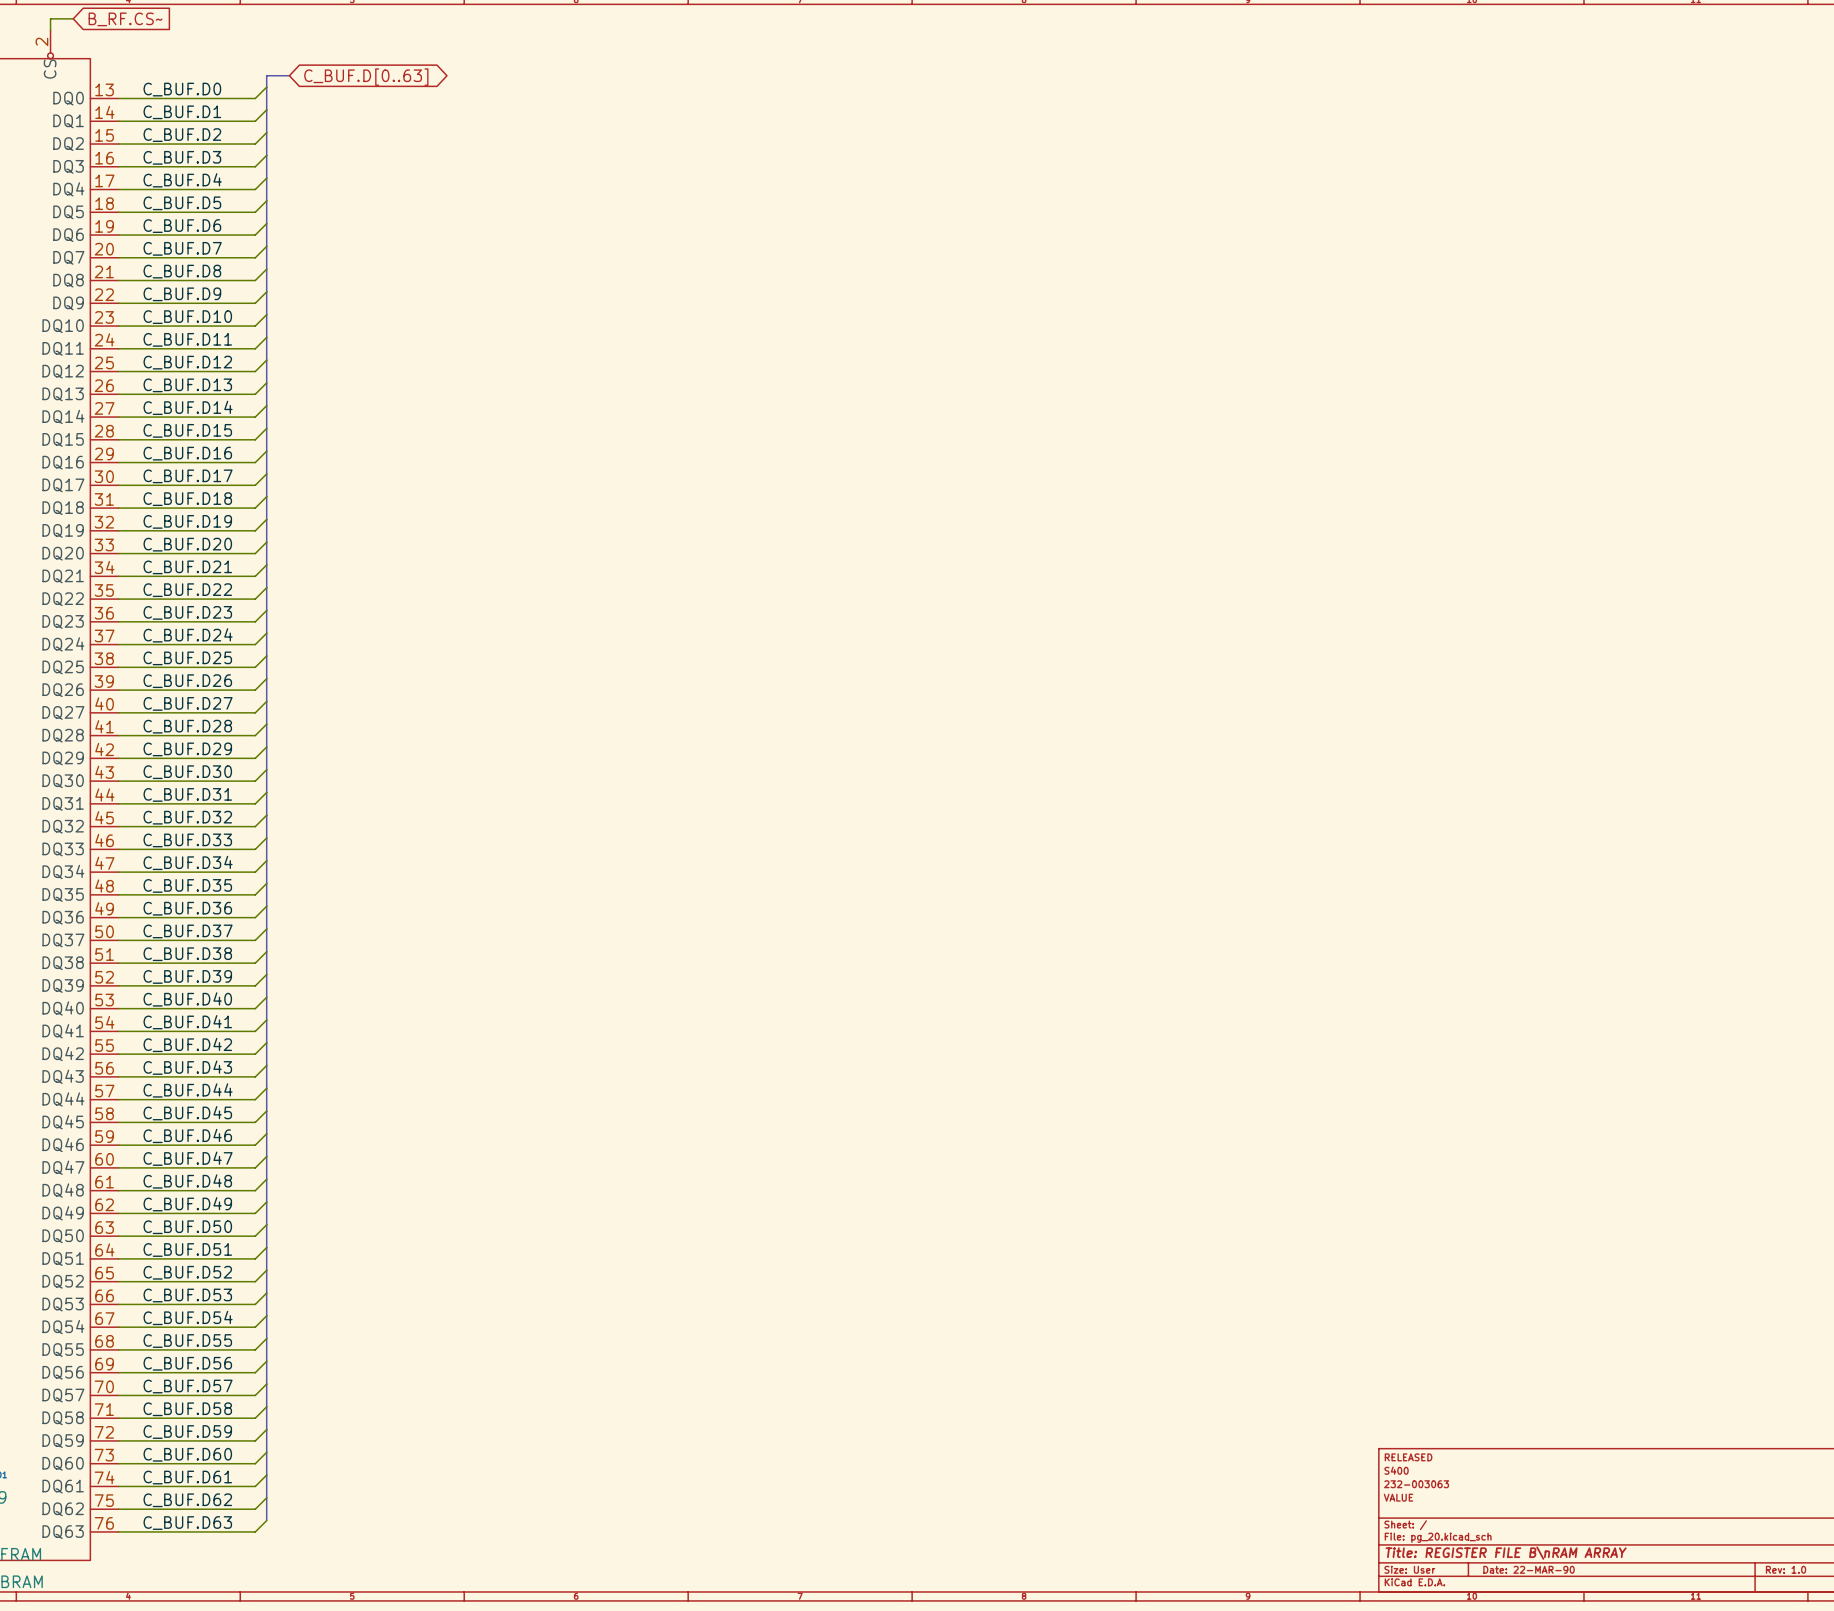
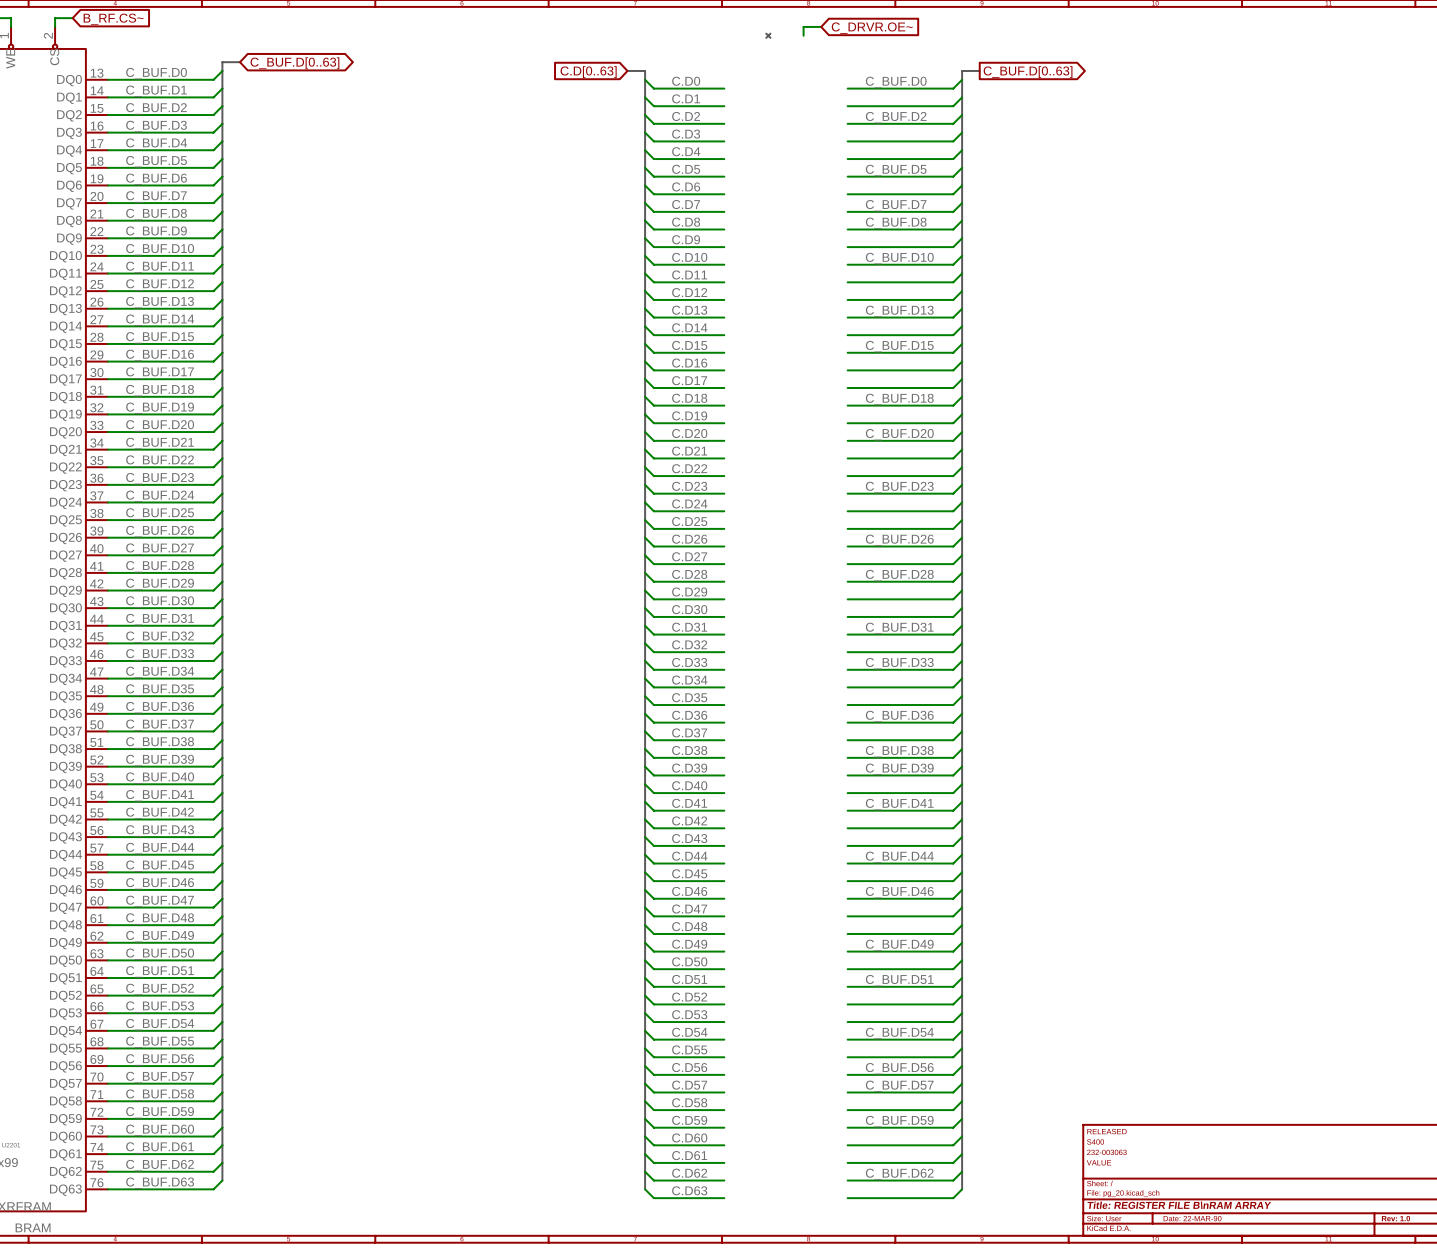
wire: none -> (821, 26) (803, 26) (803, 35)
global label: none -> C_DRVR.OE~ (872, 28)
no-connect mark: none -> (768, 35)
bus: none -> (627, 70) (645, 70) (645, 1189)
bus: none -> (979, 70) (962, 70) (962, 1189)
global label: none -> C.D[0..63] (588, 72)
global label: none -> C_BUF.D[0..63] (1028, 72)
wire: none -> (645, 79) (653, 88) (724, 88)
wire: none -> (962, 79) (953, 88) (847, 88)
label: none -> C.D0 (686, 81)
label: none -> C_BUF.D0 (896, 82)
wire: none -> (645, 97) (653, 106) (724, 106)
wire: none -> (962, 97) (953, 106) (847, 106)
label: none -> C.D1 (686, 98)
wire: none -> (645, 115) (653, 123) (724, 123)
wire: none -> (962, 115) (953, 123) (847, 123)
label: none -> C.D2 (686, 116)
label: none -> C_BUF.D2 (896, 117)
wire: none -> (645, 132) (653, 141) (724, 141)
wire: none -> (962, 132) (953, 141) (847, 141)
label: none -> C.D3 (686, 134)
wire: none -> (645, 150) (653, 159) (724, 159)
wire: none -> (962, 150) (953, 159) (847, 159)
label: none -> C.D4 (686, 151)
wire: none -> (645, 167) (653, 176) (724, 176)
wire: none -> (962, 167) (953, 176) (847, 176)
label: none -> C.D5 (686, 169)
label: none -> C_BUF.D5 (896, 170)
wire: none -> (645, 185) (653, 194) (724, 194)
wire: none -> (962, 185) (953, 194) (847, 194)
label: none -> C.D6 (686, 186)
wire: none -> (645, 203) (653, 211) (724, 211)
wire: none -> (962, 203) (953, 211) (847, 211)
label: none -> C.D7 (686, 204)
label: none -> C_BUF.D7 (896, 205)
wire: none -> (645, 220) (653, 229) (724, 229)
wire: none -> (962, 220) (953, 229) (847, 229)
label: none -> C.D8 (686, 222)
label: none -> C_BUF.D8 (896, 223)
wire: none -> (645, 238) (653, 247) (724, 247)
wire: none -> (962, 238) (953, 247) (847, 247)
label: none -> C.D9 (686, 239)
wire: none -> (645, 255) (653, 264) (724, 264)
wire: none -> (962, 255) (953, 264) (847, 264)
label: none -> C.D10 (689, 257)
label: none -> C_BUF.D10 (899, 258)
wire: none -> (645, 273) (653, 282) (724, 282)
wire: none -> (962, 273) (953, 282) (847, 282)
label: none -> C.D11 (689, 274)
wire: none -> (645, 291) (653, 299) (724, 299)
wire: none -> (962, 291) (953, 299) (847, 299)
label: none -> C.D12 (689, 292)
wire: none -> (645, 308) (653, 317) (724, 317)
wire: none -> (962, 308) (953, 317) (847, 317)
label: none -> C.D13 (689, 310)
label: none -> C_BUF.D13 (899, 311)
wire: none -> (645, 326) (653, 335) (724, 335)
wire: none -> (962, 326) (953, 335) (847, 335)
label: none -> C.D14 (689, 327)
wire: none -> (645, 343) (653, 352) (724, 352)
wire: none -> (962, 343) (953, 352) (847, 352)
label: none -> C.D15 (689, 345)
label: none -> C_BUF.D15 (899, 346)
wire: none -> (645, 361) (653, 370) (724, 370)
wire: none -> (962, 361) (953, 370) (847, 370)
label: none -> C.D16 (689, 363)
wire: none -> (645, 379) (653, 388) (724, 388)
wire: none -> (962, 379) (953, 388) (847, 388)
label: none -> C.D17 (689, 380)
wire: none -> (645, 396) (653, 405) (724, 405)
wire: none -> (962, 396) (953, 405) (847, 405)
label: none -> C.D18 (689, 398)
label: none -> C_BUF.D18 (899, 399)
wire: none -> (645, 414) (653, 423) (724, 423)
wire: none -> (962, 414) (953, 423) (847, 423)
label: none -> C.D19 (689, 415)
wire: none -> (645, 432) (653, 440) (724, 440)
wire: none -> (962, 432) (953, 440) (847, 440)
label: none -> C.D20 (689, 433)
label: none -> C_BUF.D20 (899, 434)
wire: none -> (645, 449) (653, 458) (724, 458)
wire: none -> (962, 449) (953, 458) (847, 458)
label: none -> C.D21 (689, 451)
wire: none -> (645, 467) (653, 476) (724, 476)
wire: none -> (962, 467) (953, 476) (847, 476)
label: none -> C.D22 (689, 468)
wire: none -> (645, 484) (653, 493) (724, 493)
wire: none -> (962, 484) (953, 493) (847, 493)
label: none -> C.D23 (689, 486)
label: none -> C_BUF.D23 (899, 487)
wire: none -> (645, 502) (653, 511) (724, 511)
wire: none -> (962, 502) (953, 511) (847, 511)
label: none -> C.D24 (689, 503)
wire: none -> (645, 520) (653, 528) (724, 528)
wire: none -> (962, 520) (953, 528) (847, 528)
label: none -> C.D25 (689, 521)
wire: none -> (645, 537) (653, 546) (724, 546)
wire: none -> (962, 537) (953, 546) (847, 546)
label: none -> C.D26 (689, 539)
label: none -> C_BUF.D26 (899, 540)
wire: none -> (645, 555) (653, 564) (724, 564)
wire: none -> (962, 555) (953, 564) (847, 564)
label: none -> C.D27 (689, 556)
wire: none -> (645, 572) (653, 581) (724, 581)
wire: none -> (962, 572) (953, 581) (847, 581)
label: none -> C.D28 (689, 574)
label: none -> C_BUF.D28 (899, 575)
wire: none -> (645, 590) (653, 599) (724, 599)
wire: none -> (962, 590) (953, 599) (847, 599)
label: none -> C.D29 (689, 592)
wire: none -> (645, 608) (653, 616) (724, 616)
wire: none -> (962, 608) (953, 616) (847, 616)
label: none -> C.D30 (689, 609)
wire: none -> (645, 625) (653, 634) (724, 634)
wire: none -> (962, 625) (953, 634) (847, 634)
label: none -> C.D31 (689, 627)
label: none -> C_BUF.D31 (899, 628)
wire: none -> (645, 643) (653, 652) (724, 652)
wire: none -> (962, 643) (953, 652) (847, 652)
label: none -> C.D32 (689, 644)
wire: none -> (645, 660) (653, 669) (724, 669)
wire: none -> (962, 660) (953, 669) (847, 669)
label: none -> C.D33 (689, 662)
label: none -> C_BUF.D33 (899, 663)
wire: none -> (645, 678) (653, 687) (724, 687)
wire: none -> (962, 678) (953, 687) (847, 687)
label: none -> C.D34 (689, 680)
wire: none -> (645, 696) (653, 705) (724, 705)
wire: none -> (962, 696) (953, 705) (847, 705)
label: none -> C.D35 (689, 697)
wire: none -> (645, 713) (653, 722) (724, 722)
wire: none -> (962, 713) (953, 722) (847, 722)
label: none -> C.D36 (689, 715)
label: none -> C_BUF.D36 (899, 716)
wire: none -> (645, 731) (653, 740) (724, 740)
wire: none -> (962, 731) (953, 740) (847, 740)
label: none -> C.D37 (689, 732)
wire: none -> (645, 749) (653, 757) (724, 757)
wire: none -> (962, 749) (953, 757) (847, 757)
label: none -> C.D38 (689, 750)
label: none -> C_BUF.D38 (899, 751)
wire: none -> (645, 766) (653, 775) (724, 775)
wire: none -> (962, 766) (953, 775) (847, 775)
label: none -> C.D39 (689, 768)
label: none -> C_BUF.D39 (899, 769)
wire: none -> (645, 784) (653, 793) (724, 793)
wire: none -> (962, 784) (953, 793) (847, 793)
label: none -> C.D40 (689, 785)
wire: none -> (645, 801) (653, 810) (724, 810)
wire: none -> (962, 801) (953, 810) (847, 810)
label: none -> C.D41 (689, 803)
label: none -> C_BUF.D41 (899, 804)
wire: none -> (645, 819) (653, 828) (724, 828)
wire: none -> (962, 819) (953, 828) (847, 828)
label: none -> C.D42 (689, 820)
wire: none -> (645, 837) (653, 845) (724, 845)
wire: none -> (962, 837) (953, 845) (847, 845)
label: none -> C.D43 (689, 838)
wire: none -> (645, 854) (653, 863) (724, 863)
wire: none -> (962, 854) (953, 863) (847, 863)
label: none -> C.D44 (689, 856)
label: none -> C_BUF.D44 (899, 857)
wire: none -> (645, 872) (653, 881) (724, 881)
wire: none -> (962, 872) (953, 881) (847, 881)
label: none -> C.D45 (689, 873)
wire: none -> (645, 889) (653, 898) (724, 898)
wire: none -> (962, 889) (953, 898) (847, 898)
label: none -> C.D46 (689, 891)
label: none -> C_BUF.D46 (899, 892)
wire: none -> (645, 907) (653, 916) (724, 916)
wire: none -> (962, 907) (953, 916) (847, 916)
label: none -> C.D47 (689, 909)
wire: none -> (645, 925) (653, 933) (724, 933)
wire: none -> (962, 925) (953, 933) (847, 933)
label: none -> C.D48 (689, 926)
wire: none -> (645, 942) (653, 951) (724, 951)
wire: none -> (962, 942) (953, 951) (847, 951)
label: none -> C.D49 (689, 944)
label: none -> C_BUF.D49 (899, 945)
wire: none -> (645, 960) (653, 969) (724, 969)
wire: none -> (962, 960) (953, 969) (847, 969)
label: none -> C.D50 (689, 961)
wire: none -> (645, 978) (653, 986) (724, 986)
wire: none -> (962, 978) (953, 986) (847, 986)
label: none -> C.D51 (689, 979)
label: none -> C_BUF.D51 (899, 980)
wire: none -> (645, 995) (653, 1004) (724, 1004)
wire: none -> (962, 995) (953, 1004) (847, 1004)
label: none -> C.D52 (689, 997)
wire: none -> (645, 1013) (653, 1022) (724, 1022)
wire: none -> (962, 1013) (953, 1022) (847, 1022)
label: none -> C.D53 (689, 1014)
wire: none -> (645, 1030) (653, 1039) (724, 1039)
wire: none -> (962, 1030) (953, 1039) (847, 1039)
label: none -> C.D54 (689, 1032)
label: none -> C_BUF.D54 (899, 1033)
wire: none -> (645, 1048) (653, 1057) (724, 1057)
wire: none -> (962, 1048) (953, 1057) (847, 1057)
label: none -> C.D55 (689, 1049)
wire: none -> (645, 1066) (653, 1074) (724, 1074)
wire: none -> (962, 1066) (953, 1074) (847, 1074)
label: none -> C.D56 (689, 1067)
label: none -> C_BUF.D56 (899, 1068)
wire: none -> (645, 1083) (653, 1092) (724, 1092)
wire: none -> (962, 1083) (953, 1092) (847, 1092)
label: none -> C.D57 (689, 1085)
label: none -> C_BUF.D57 (899, 1086)
wire: none -> (645, 1101) (653, 1110) (724, 1110)
wire: none -> (962, 1101) (953, 1110) (847, 1110)
label: none -> C.D58 (689, 1102)
wire: none -> (645, 1118) (653, 1127) (724, 1127)
wire: none -> (962, 1118) (953, 1127) (847, 1127)
label: none -> C.D59 (689, 1120)
label: none -> C_BUF.D59 (899, 1121)
wire: none -> (645, 1136) (653, 1145) (724, 1145)
wire: none -> (962, 1136) (953, 1145) (847, 1145)
label: none -> C.D60 (689, 1137)
wire: none -> (645, 1154) (653, 1162) (724, 1162)
wire: none -> (962, 1154) (953, 1162) (847, 1162)
label: none -> C.D61 (689, 1155)
wire: none -> (645, 1171) (653, 1180) (724, 1180)
wire: none -> (962, 1171) (953, 1180) (847, 1180)
label: none -> C.D62 (689, 1173)
label: none -> C_BUF.D62 (899, 1174)
wire: none -> (645, 1189) (653, 1198) (724, 1198)
wire: none -> (962, 1189) (953, 1198) (847, 1198)
label: none -> C.D63 (689, 1190)

